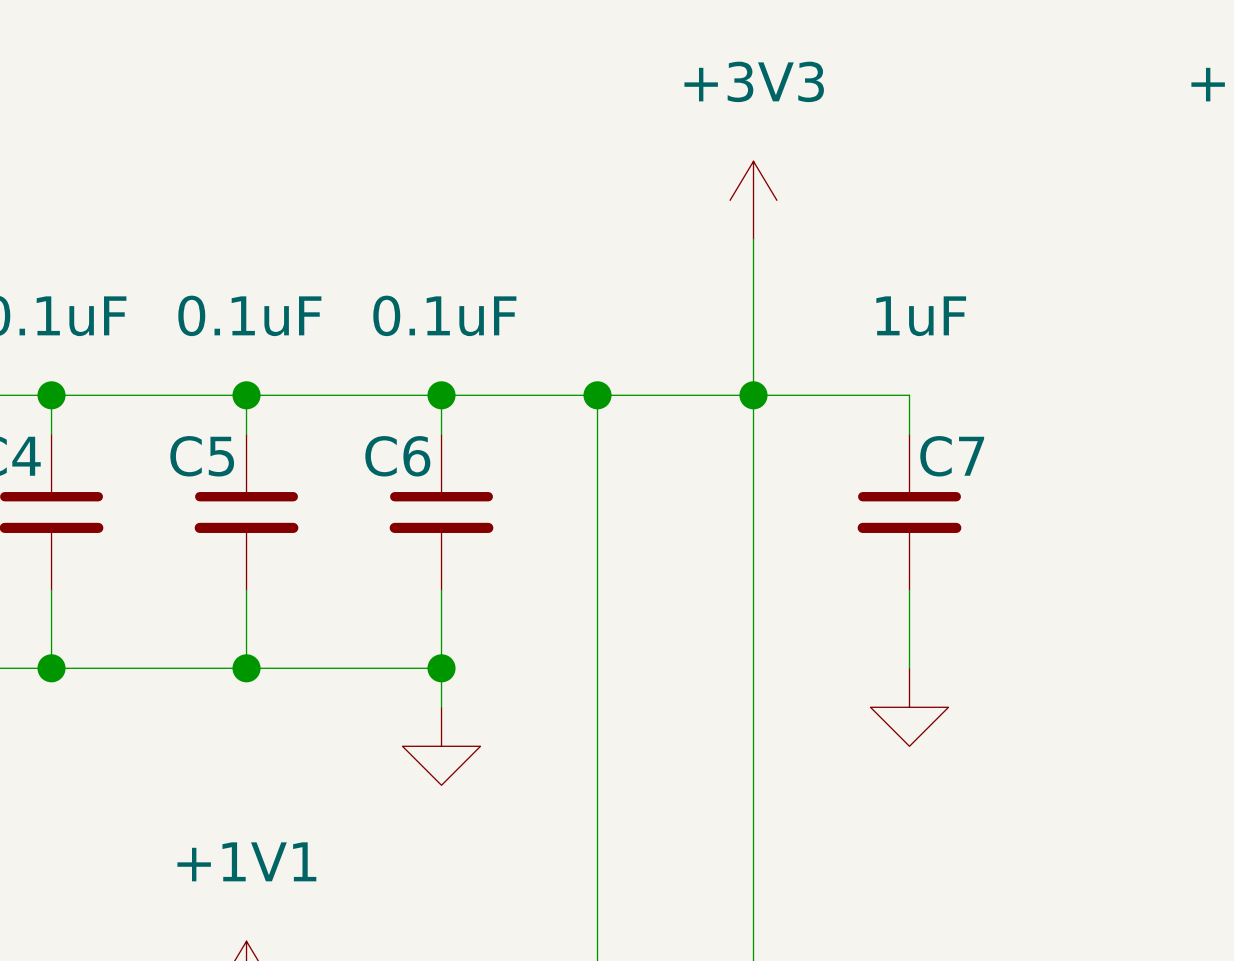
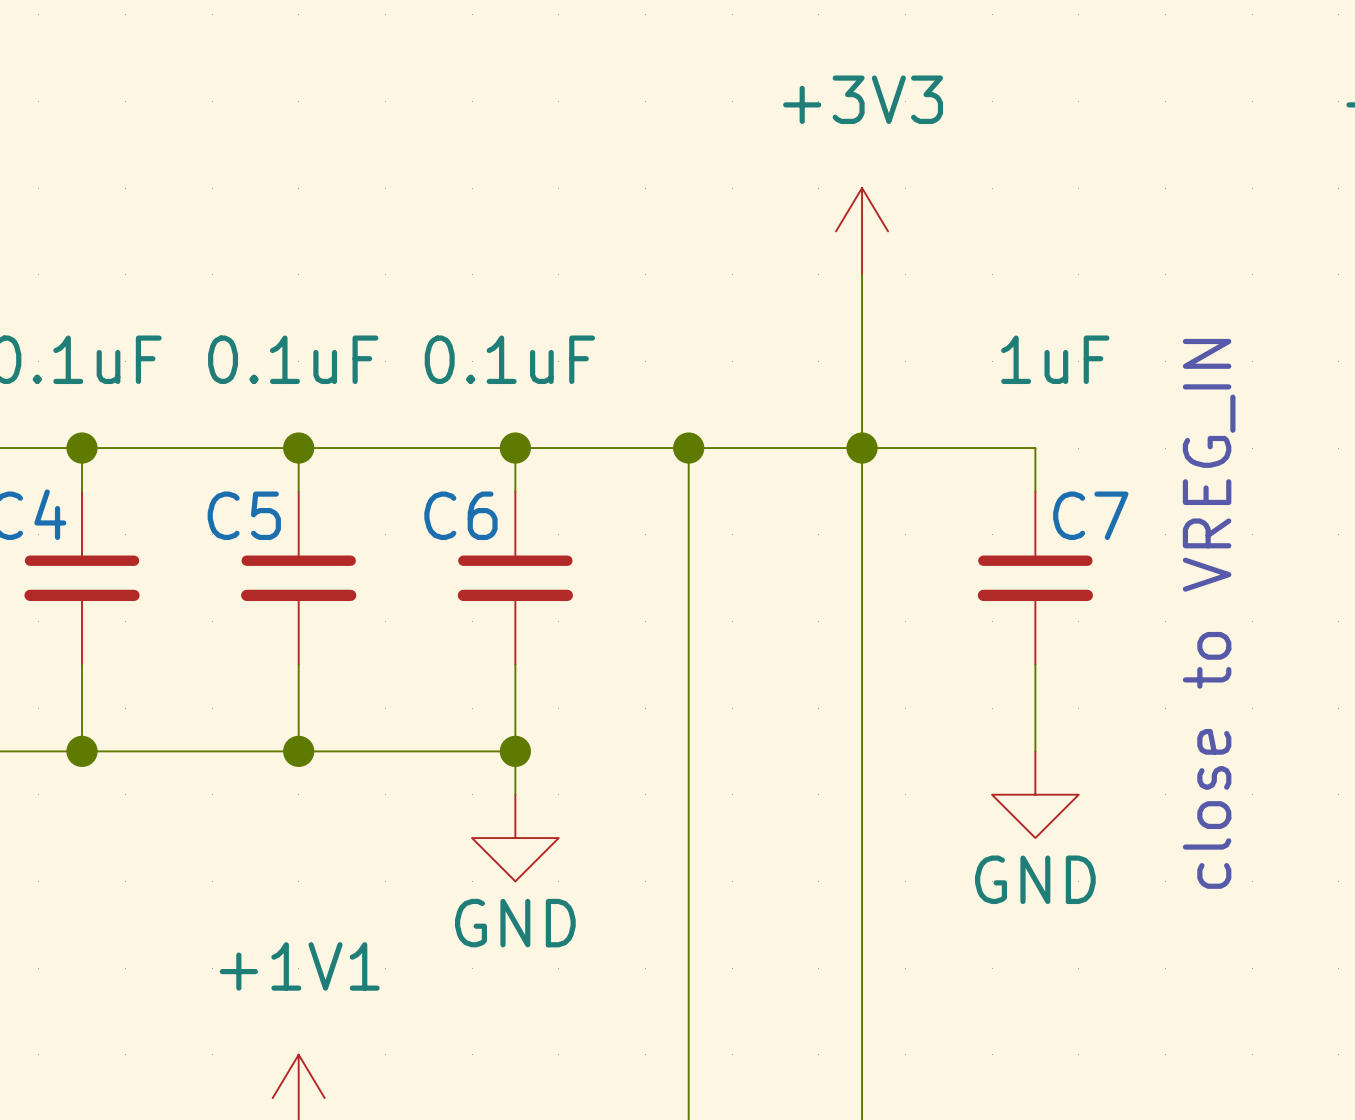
text: none -> close to VREG_IN (1209, 613)
power symbol text: none -> GND (1035, 879)
power symbol text: none -> GND (515, 923)

